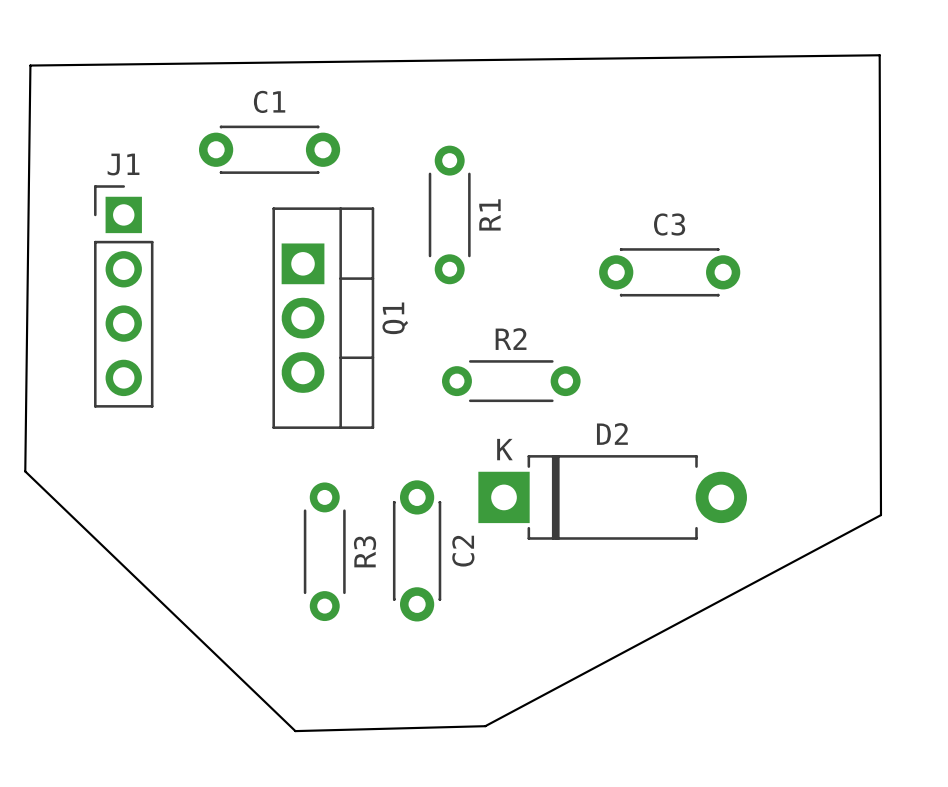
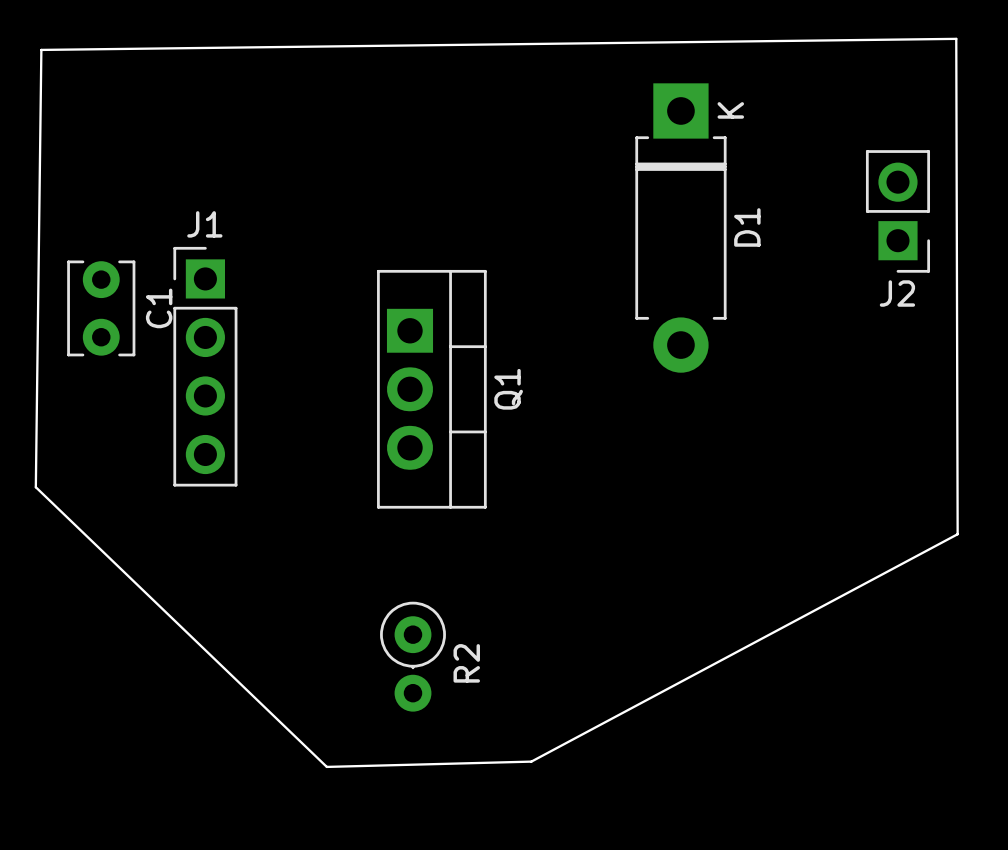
C1 name position: C1 (269, 101) -> C1 (159, 308)
C1 footprint: [198, 125, 341, 174] -> [67, 260, 136, 357]
R1: (449, 214) -> none
J2: none -> (897, 211)
D1: none -> (680, 228)
C3: (669, 272) -> none
J1 position: (123, 296) -> (205, 366)
Q1 position: (323, 318) -> (431, 389)
R2 name position: R2 (511, 339) -> R2 (466, 663)
R2 footprint: [441, 360, 581, 403] -> [380, 601, 446, 712]
D2: (612, 497) -> none
C2: (417, 550) -> none
R3: (324, 551) -> none

